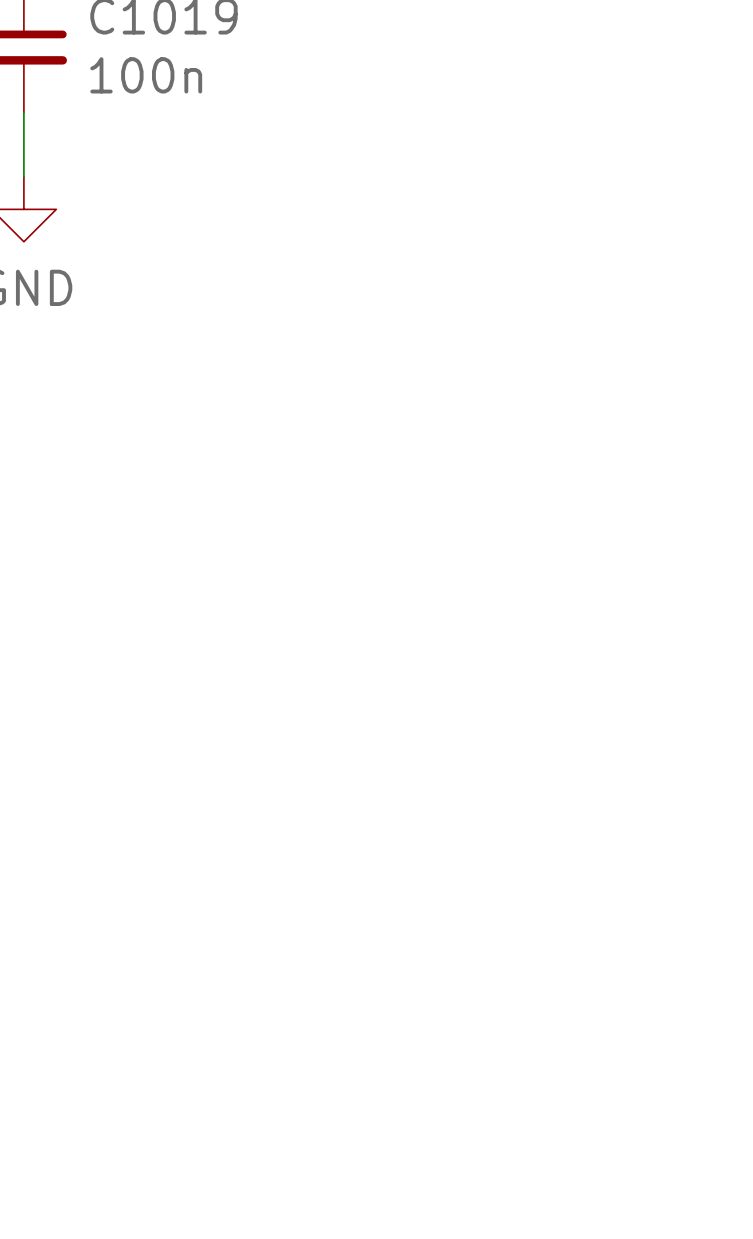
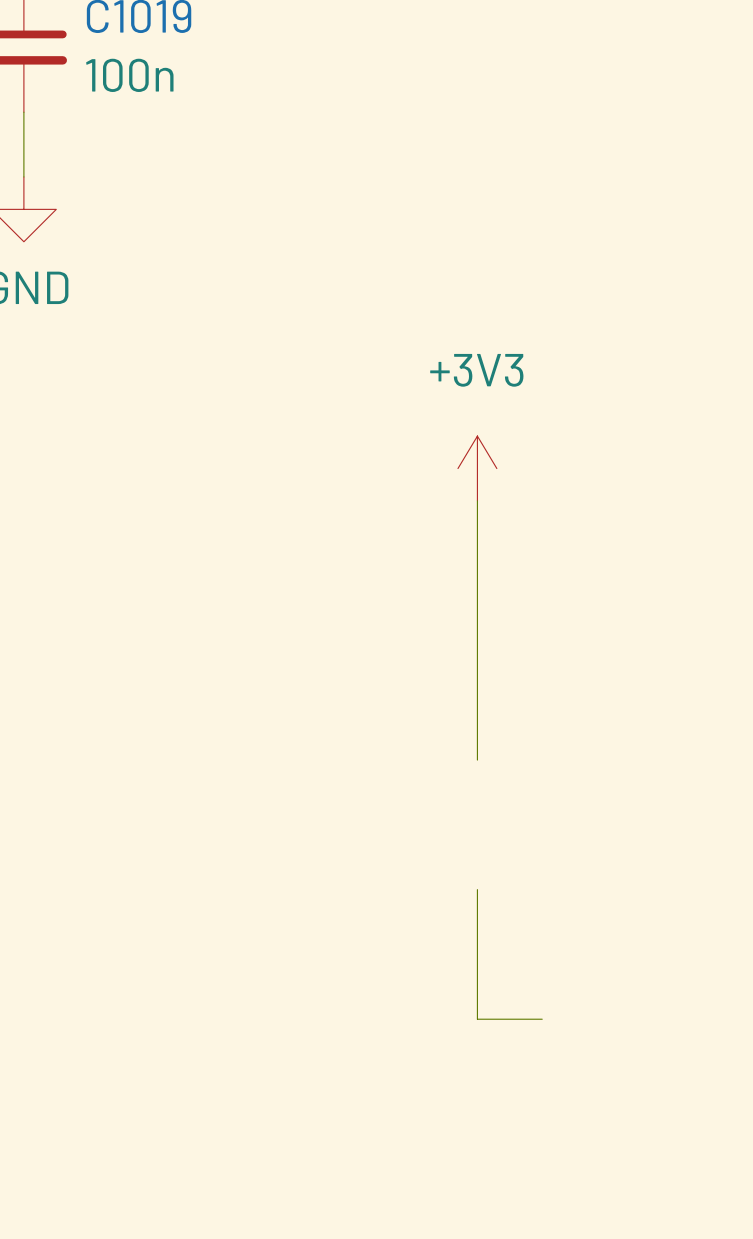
power symbol: none -> +3V3 (477, 468)
wire: none -> (477, 500) (477, 760)
wire: none -> (477, 889) (477, 1019) (542, 1019)

